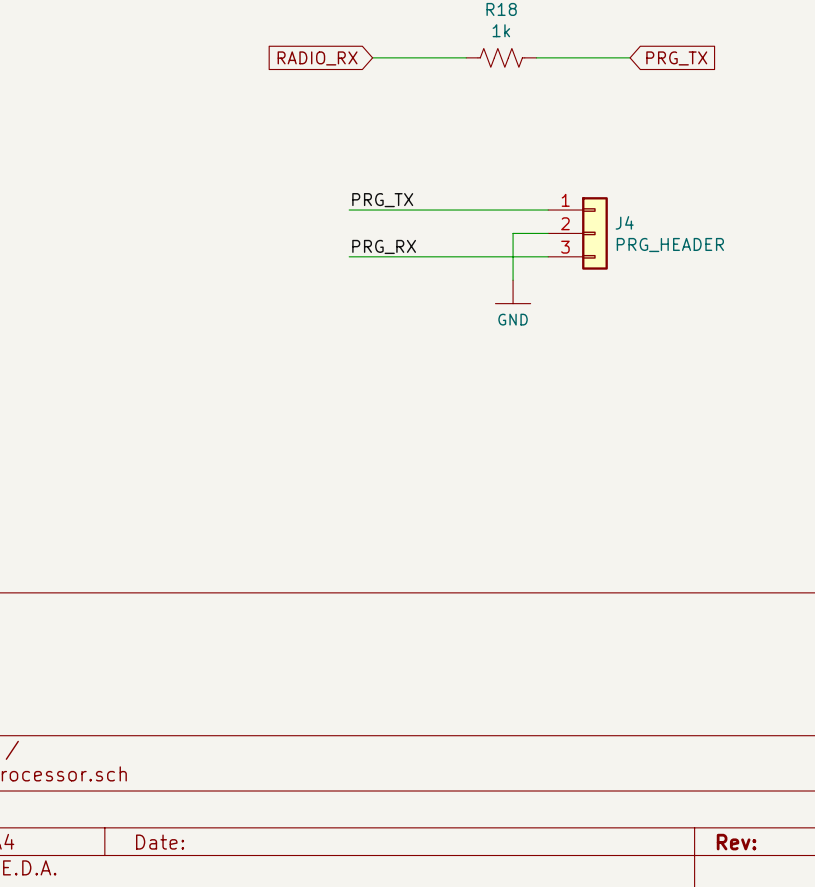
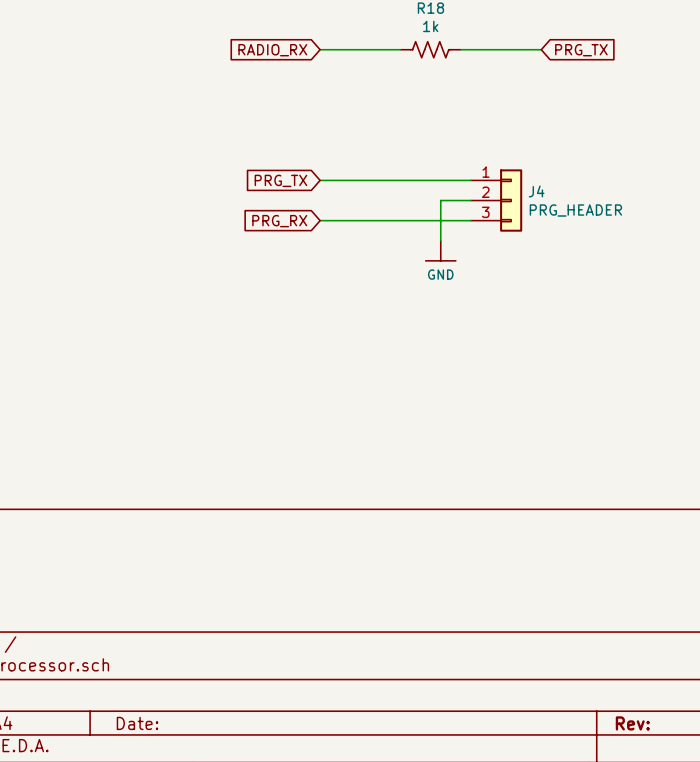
label: PRG_TX (382, 200) -> none
global label: none -> PRG_TX (280, 180)
wire: (349, 210) (372, 210) -> none
label: PRG_RX (384, 246) -> none
wire: (349, 256) (372, 256) -> none
global label: none -> PRG_RX (279, 221)

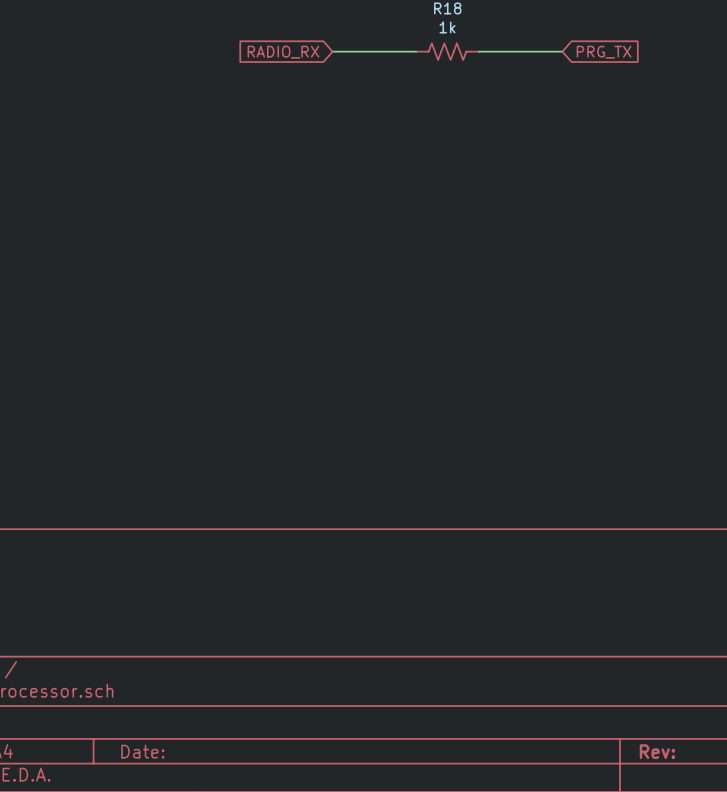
global label: PRG_TX (280, 180) -> none
wire: (320, 180) (470, 180) -> none
wire: (470, 200) (440, 200) (440, 240) -> none
J4: PRG_HEADER (496, 200) -> none
wire: (320, 220) (470, 220) -> none
global label: PRG_RX (279, 221) -> none
power symbol: GND (440, 250) -> none

